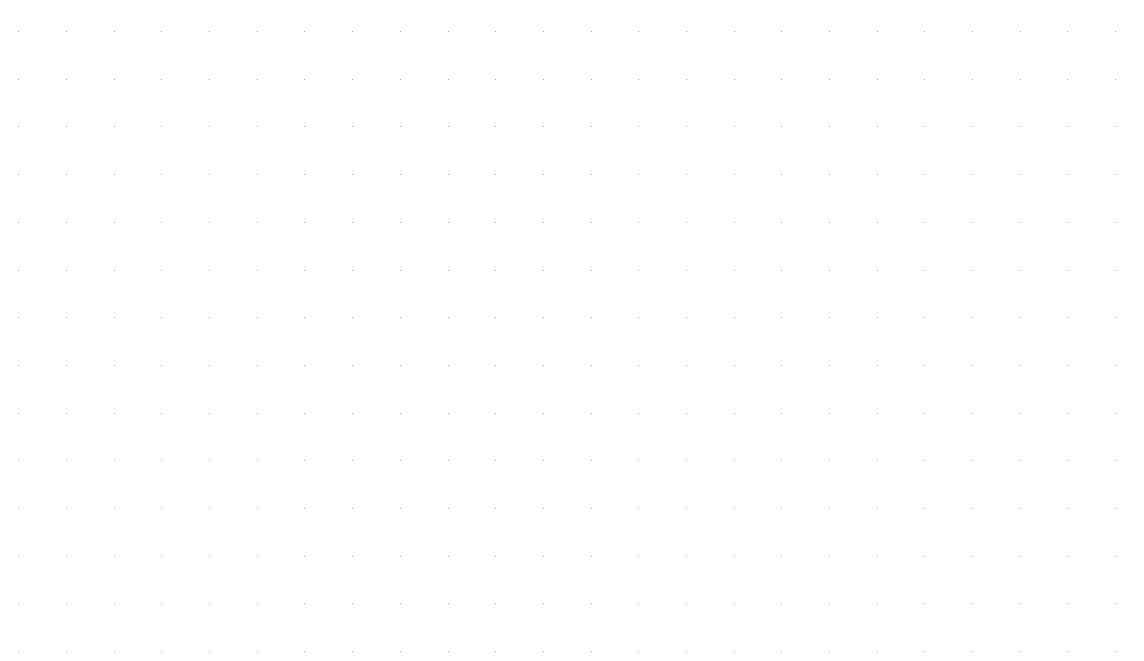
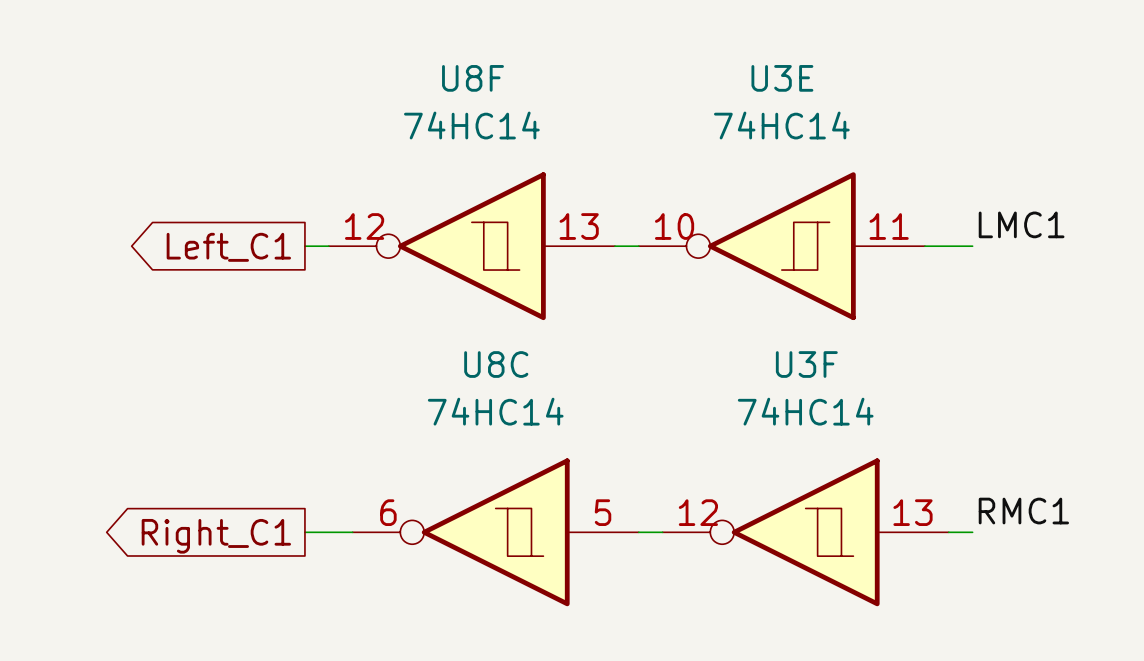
label: none -> LMC1 (1021, 224)
wire: none -> (304, 246) (328, 246)
U8F: none -> 74HC14 (471, 246)
wire: none -> (614, 246) (638, 246)
U3E: none -> 74HC14 (781, 246)
wire: none -> (924, 246) (972, 246)
global label: none -> Left_C1 (228, 247)
label: none -> RMC1 (1023, 511)
wire: none -> (304, 532) (352, 532)
U8C: none -> 74HC14 (495, 532)
wire: none -> (638, 532) (662, 532)
U3F: none -> 74HC14 (805, 532)
wire: none -> (948, 532) (972, 532)
global label: none -> Right_C1 (216, 536)

